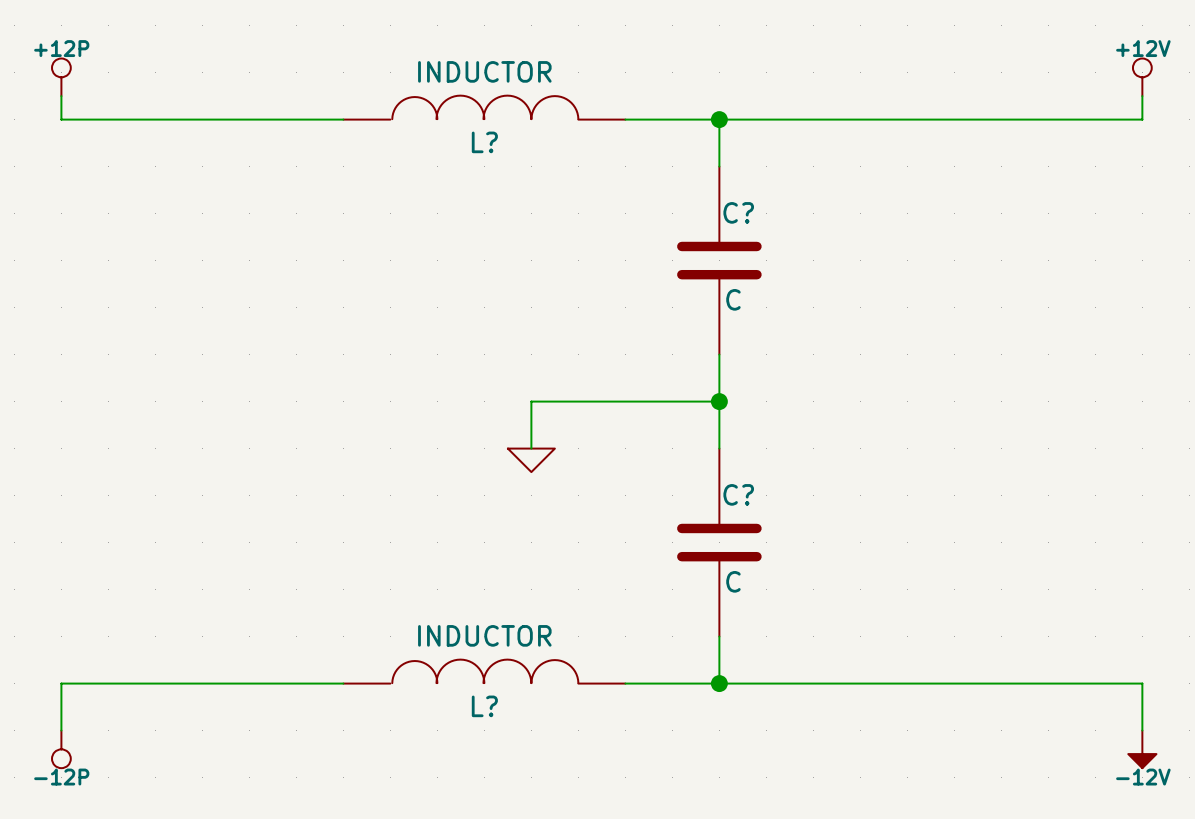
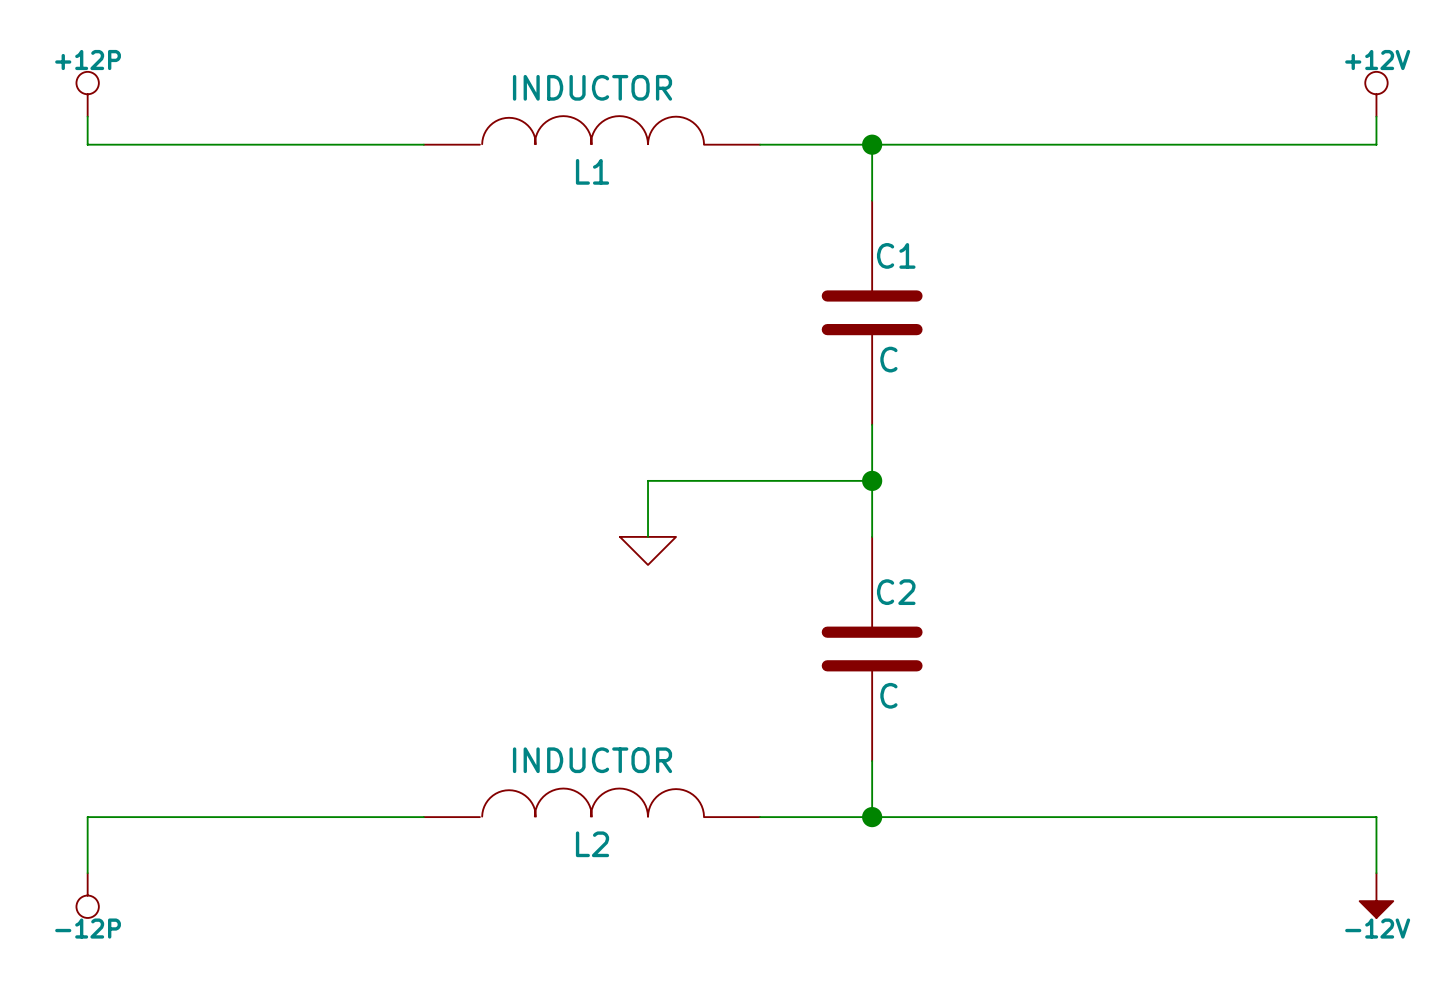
L? name: L? (484, 142) -> L1 (592, 171)
C? name: C? (738, 212) -> C1 (896, 255)
C? name: C? (738, 494) -> C2 (896, 592)
L? name: L? (484, 706) -> L2 (592, 844)

